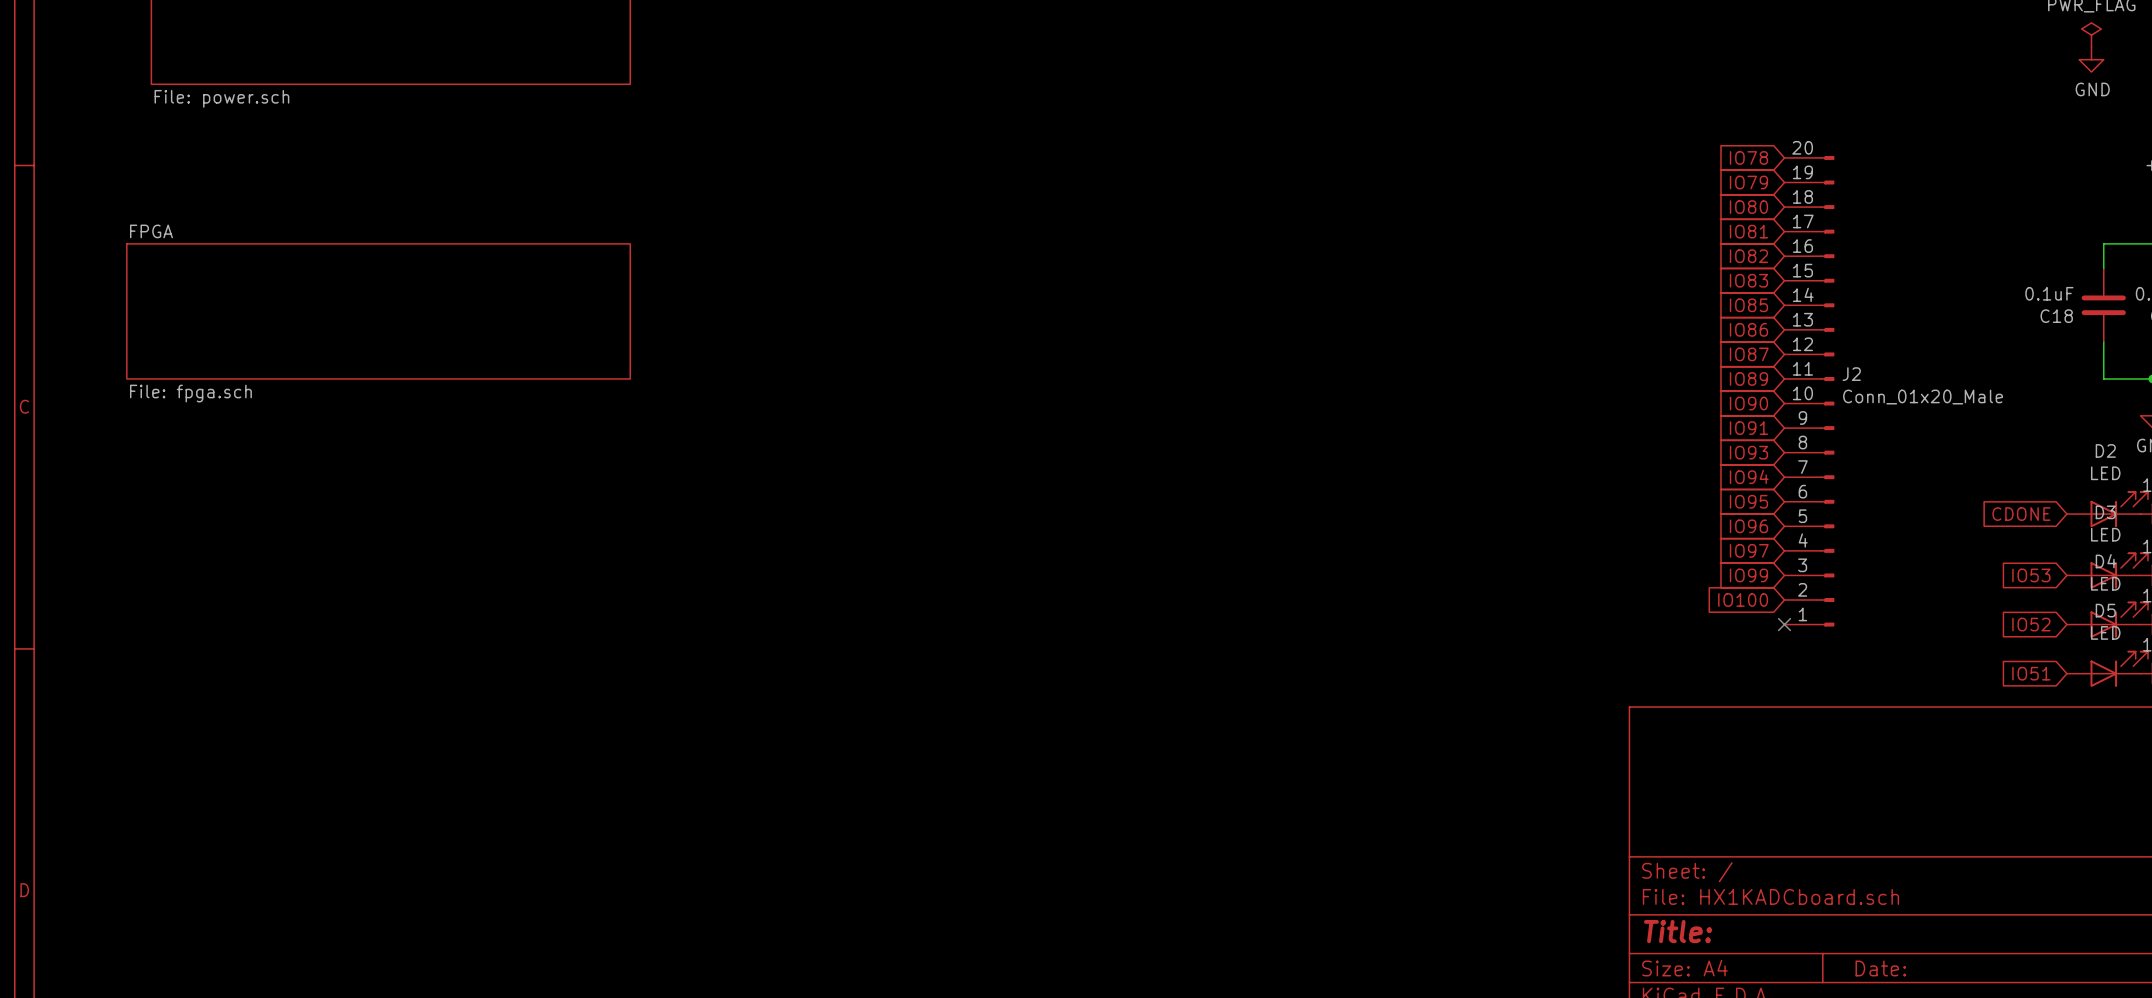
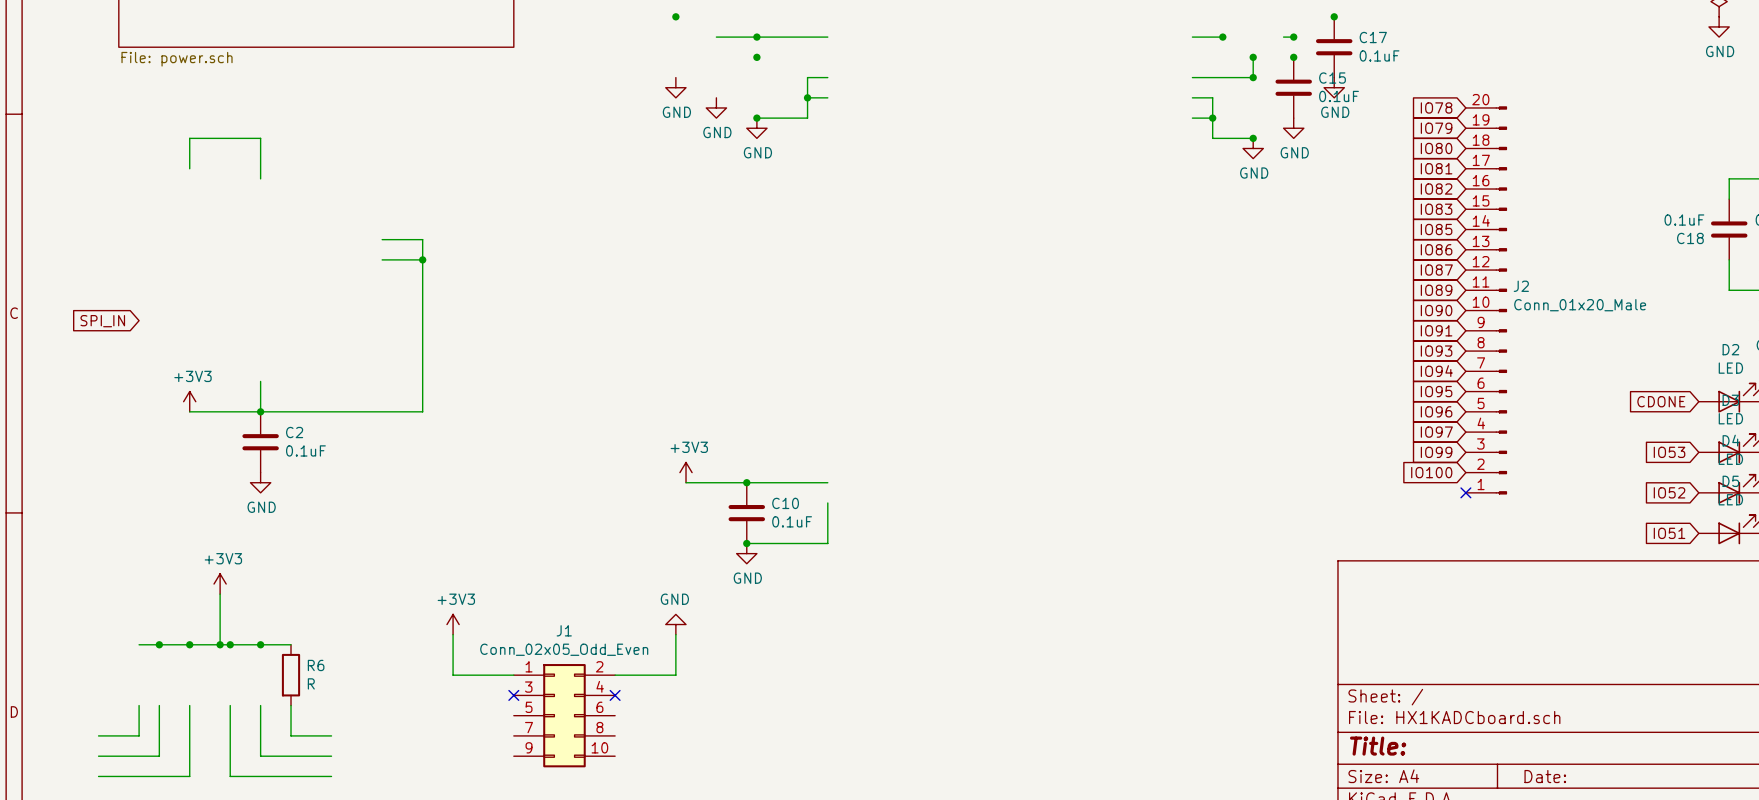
junction: none -> (675, 16)
junction: none -> (1334, 16)
wire: none -> (716, 37) (827, 37)
junction: none -> (756, 37)
wire: none -> (1192, 37) (1222, 37)
junction: none -> (1222, 37)
wire: none -> (1283, 37) (1293, 37)
junction: none -> (1293, 37)
C17: none -> 0.1uF (1334, 47)
junction: none -> (756, 57)
wire: none -> (1253, 57) (1253, 77) (1192, 77)
junction: none -> (1253, 57)
junction: none -> (1293, 57)
wire: none -> (827, 77) (807, 77) (807, 118) (756, 118)
junction: none -> (1253, 77)
power symbol: none -> GND (675, 87)
C15: none -> 0.1uF (1293, 87)
power symbol: none -> GND (1334, 87)
wire: none -> (807, 97) (827, 97)
junction: none -> (807, 97)
wire: none -> (1192, 97) (1212, 97) (1212, 138) (1253, 138)
power symbol: none -> GND (716, 107)
junction: none -> (756, 118)
wire: none -> (1192, 118) (1212, 118)
junction: none -> (1212, 118)
power symbol: none -> GND (756, 128)
power symbol: none -> GND (1293, 128)
junction: none -> (1253, 138)
power symbol: none -> GND (1253, 148)
wire: none -> (189, 168) (189, 138) (260, 138) (260, 178)
sheet FPGA: File: fpga.sch (378, 311) -> none
wire: none -> (382, 239) (422, 239) (422, 411) (189, 411)
wire: none -> (382, 259) (422, 259)
junction: none -> (422, 259)
global label: none -> SPI_IN (102, 321)
wire: none -> (260, 381) (260, 411)
power symbol: none -> +3V3 (189, 401)
junction: none -> (260, 411)
C2: none -> 0.1uF (260, 442)
power symbol: none -> +3V3 (686, 472)
power symbol: none -> GND (260, 482)
wire: none -> (686, 482) (827, 482)
junction: none -> (746, 482)
wire: none -> (827, 502) (827, 543) (746, 543)
C10: none -> 0.1uF (746, 513)
junction: none -> (746, 543)
power symbol: none -> GND (746, 553)
power symbol: none -> +3V3 (220, 584)
wire: none -> (220, 594) (220, 644)
power symbol: none -> +3V3 (453, 624)
power symbol: none -> GND (675, 624)
wire: none -> (453, 634) (453, 675) (513, 675)
wire: none -> (675, 634) (675, 675) (615, 675)
wire: none -> (139, 644) (291, 644)
junction: none -> (159, 644)
junction: none -> (189, 644)
junction: none -> (220, 644)
junction: none -> (230, 644)
junction: none -> (260, 644)
R6: none -> R (291, 675)
no-connect mark: none -> (513, 695)
no-connect mark: none -> (615, 695)
wire: none -> (139, 705) (139, 735) (98, 735)
wire: none -> (159, 705) (159, 756) (98, 756)
wire: none -> (189, 705) (189, 776) (98, 776)
wire: none -> (230, 705) (230, 776) (331, 776)
wire: none -> (260, 705) (260, 756) (331, 756)
wire: none -> (291, 705) (291, 735) (331, 735)
J1: none -> Conn_02x05_Odd_Even (564, 715)

